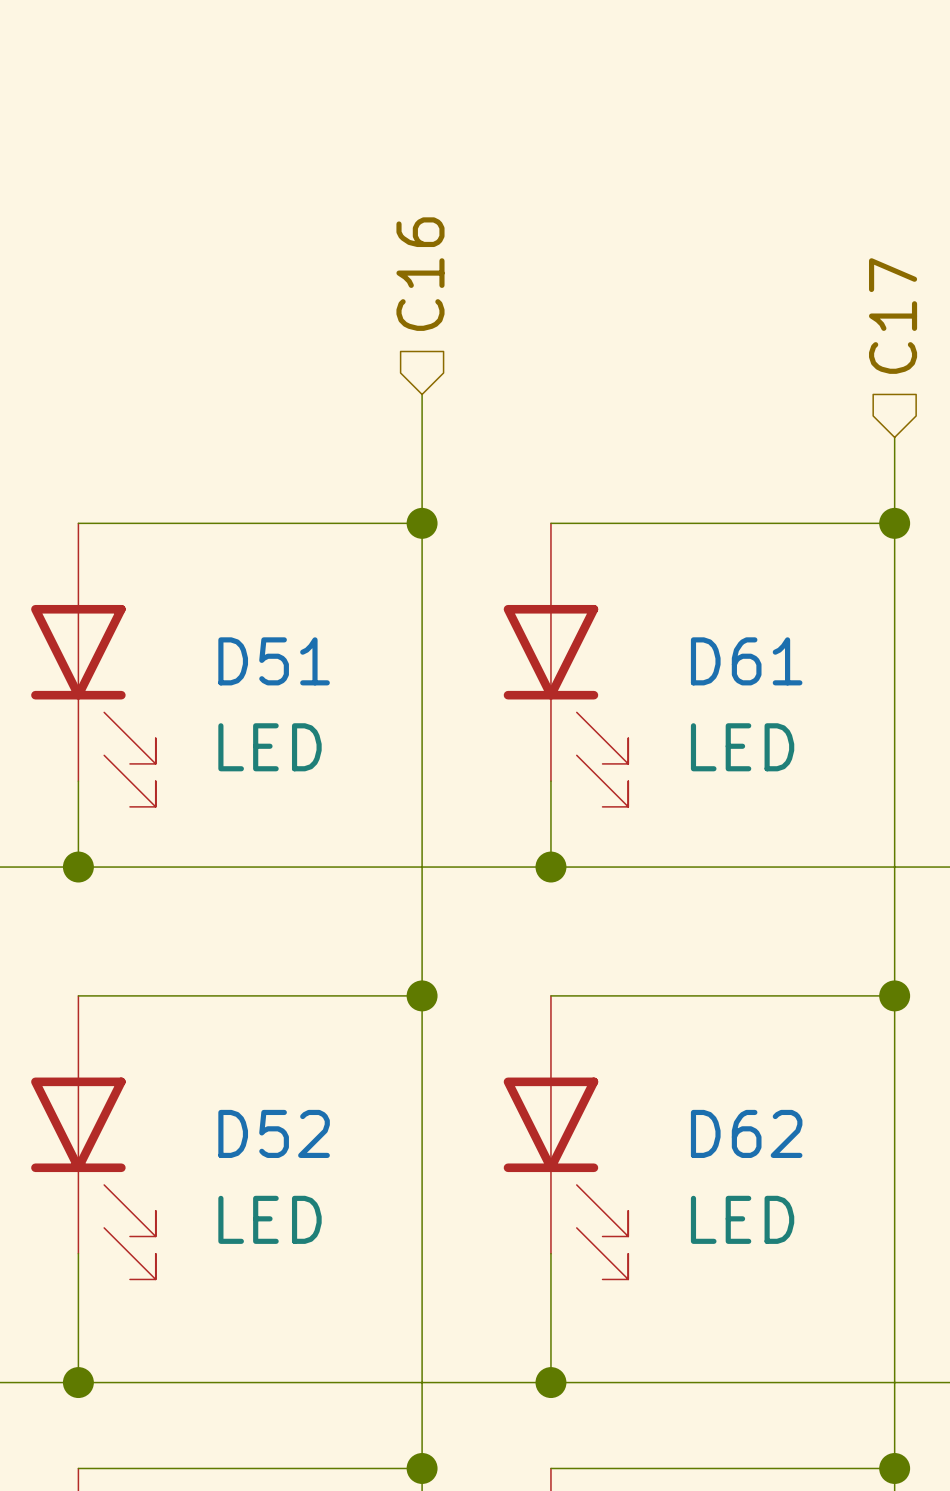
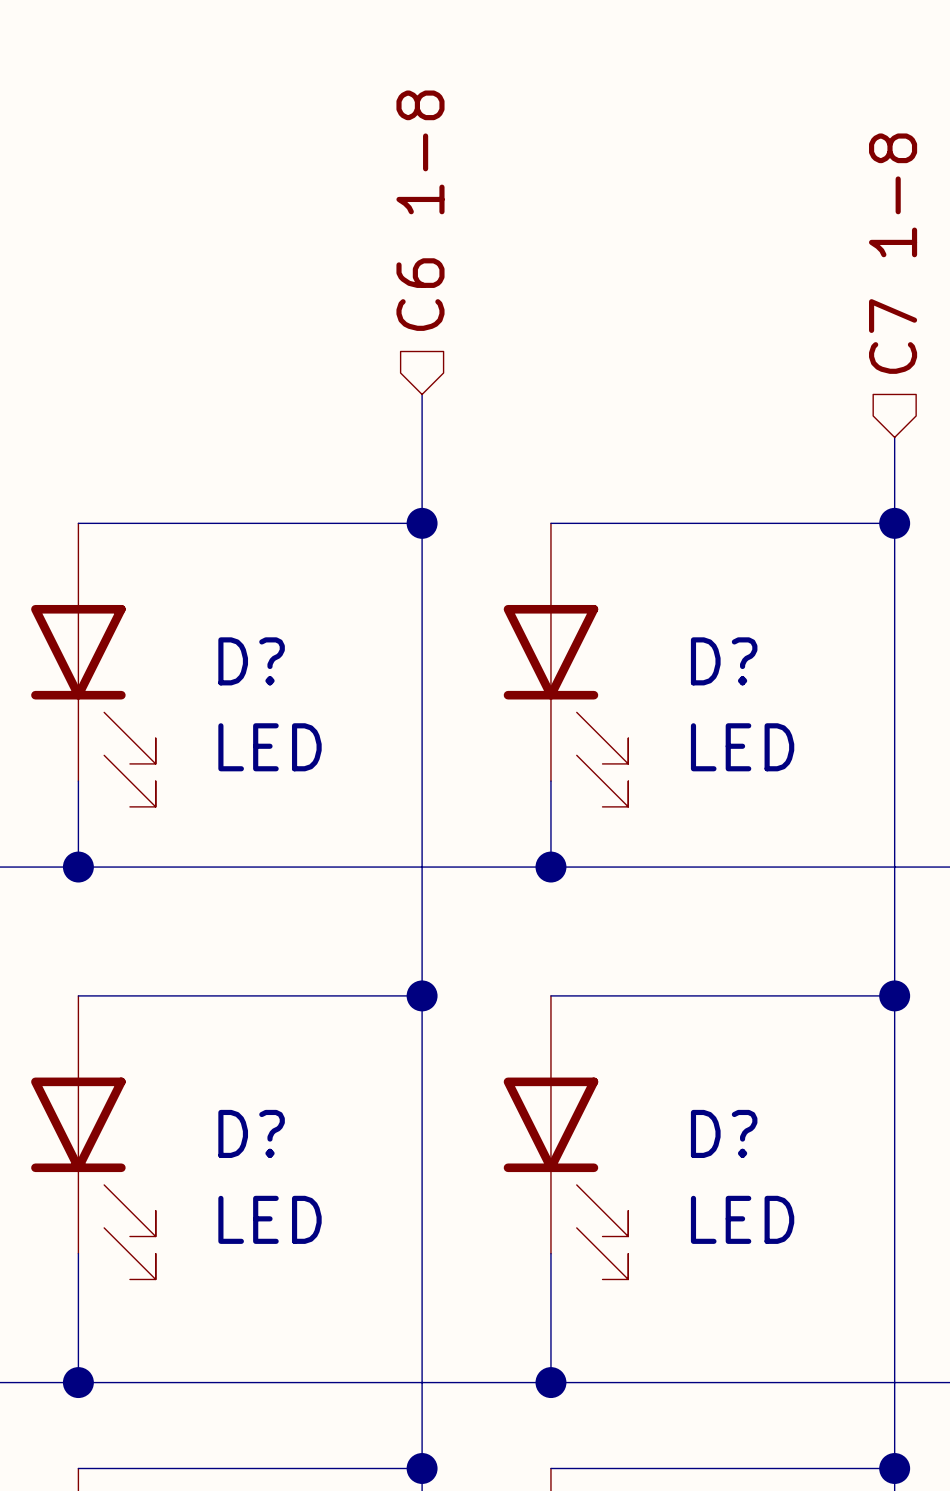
hierarchical label: C16 (420, 274) -> C6 1-8 (420, 210)
hierarchical label: C17 (893, 316) -> C7 1-8 (893, 253)
D51 name: D51 (274, 661) -> D? (251, 661)
D61 name: D61 (746, 661) -> D? (724, 661)
D52 name: D52 (274, 1133) -> D? (251, 1133)
D62 name: D62 (746, 1133) -> D? (724, 1133)

